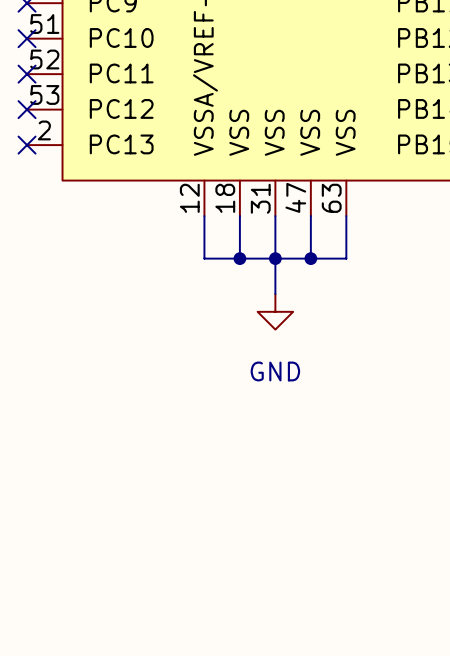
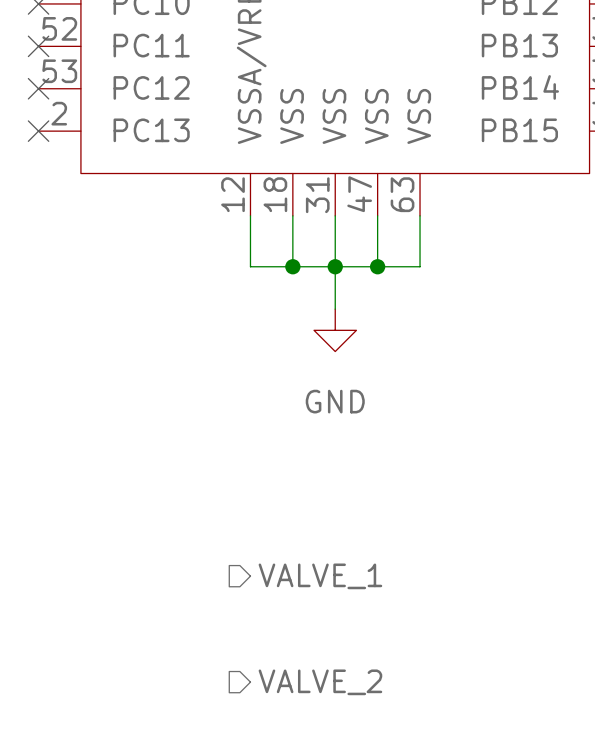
hierarchical label: none -> VALVE_1 (320, 576)
hierarchical label: none -> VALVE_2 (320, 682)

